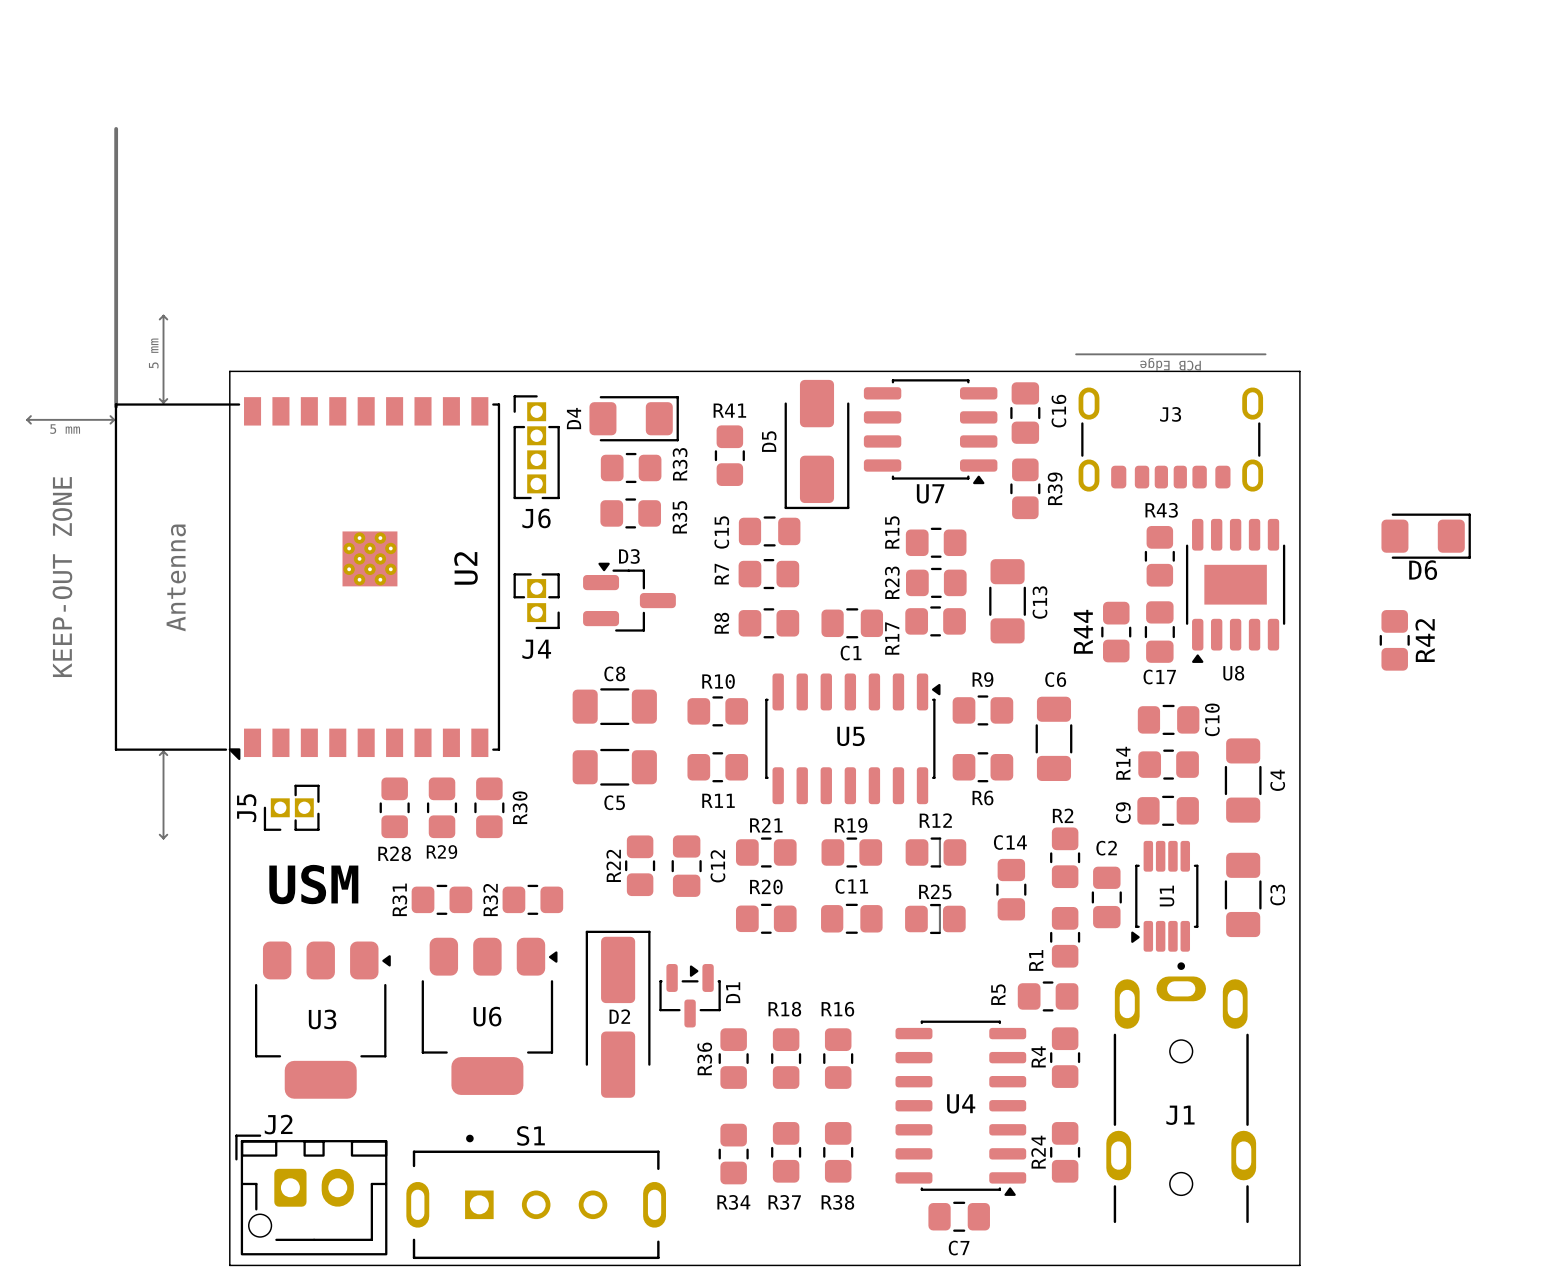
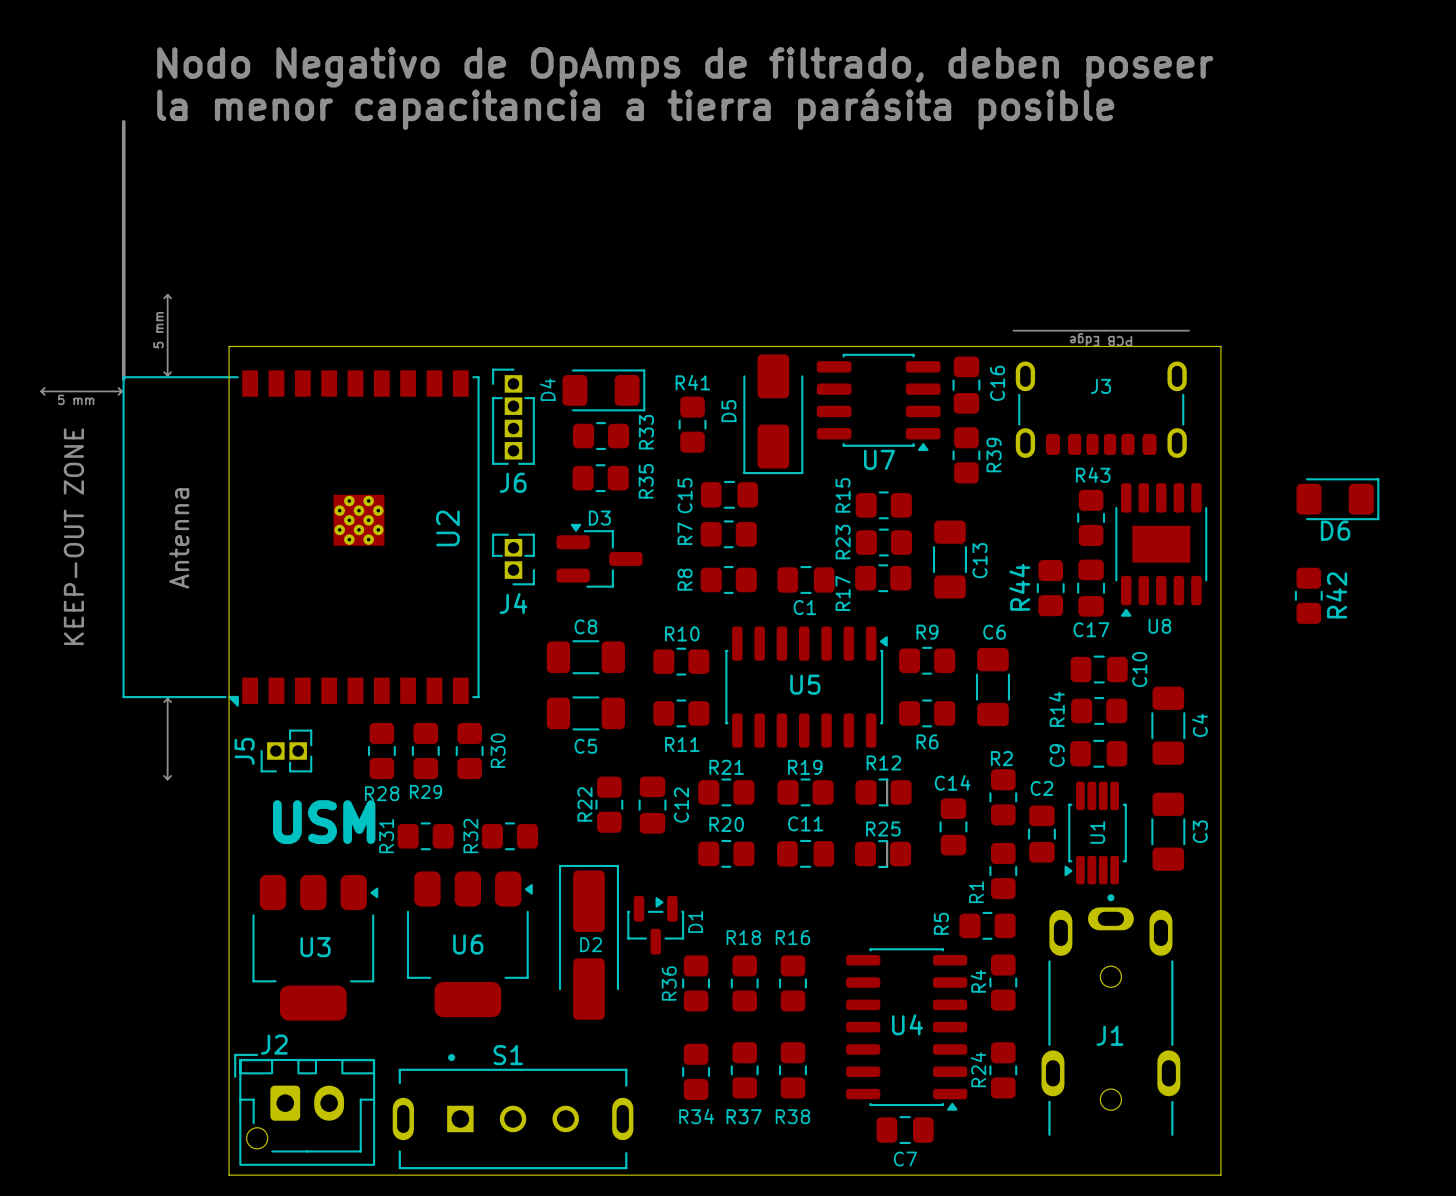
text: none -> Nodo Negativo de OpAmps de filtrado, deben poseer (685, 67)
text: none -> la menor capacitancia a tierra parásita posible (635, 109)

